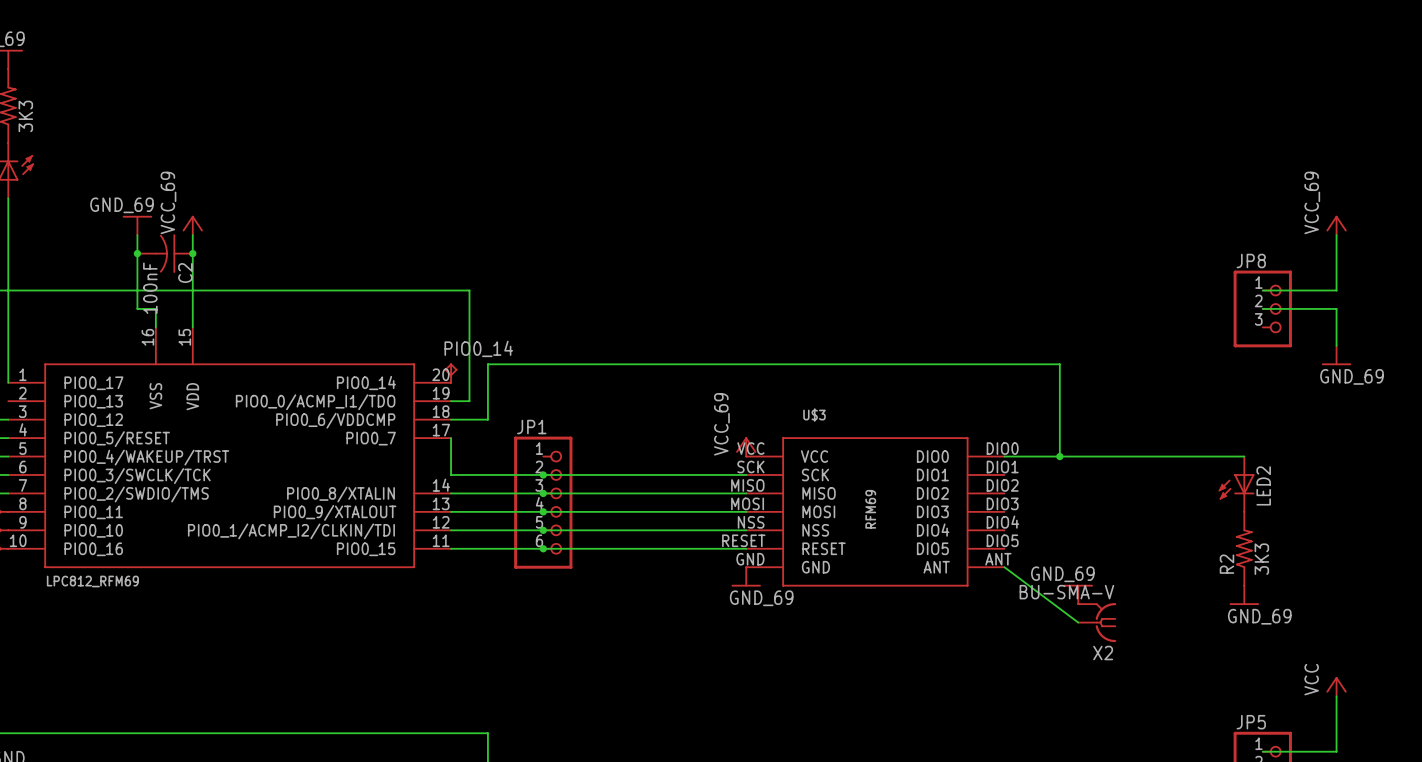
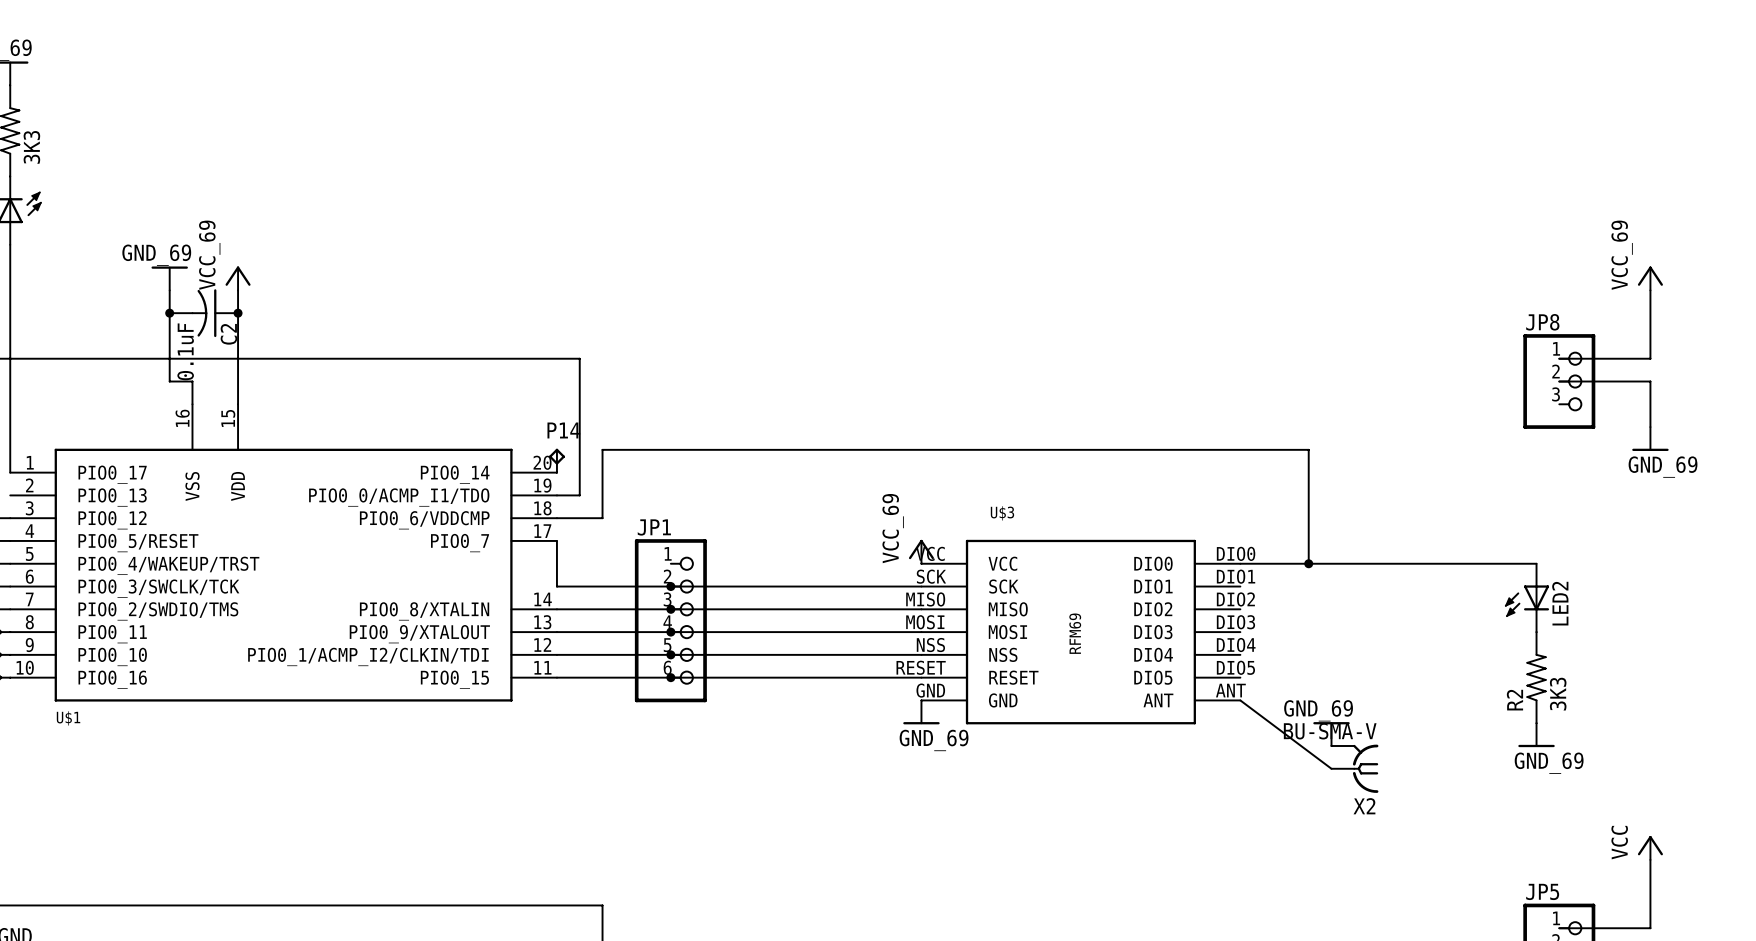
C2 value: 100nF (150, 288) -> 0.1uF (185, 351)
PIO0_14 name: PIO0_14 (478, 348) -> P14 (563, 430)
LPC812_RFM69 name: LPC812_RFM69 (92, 581) -> U$1 (68, 718)

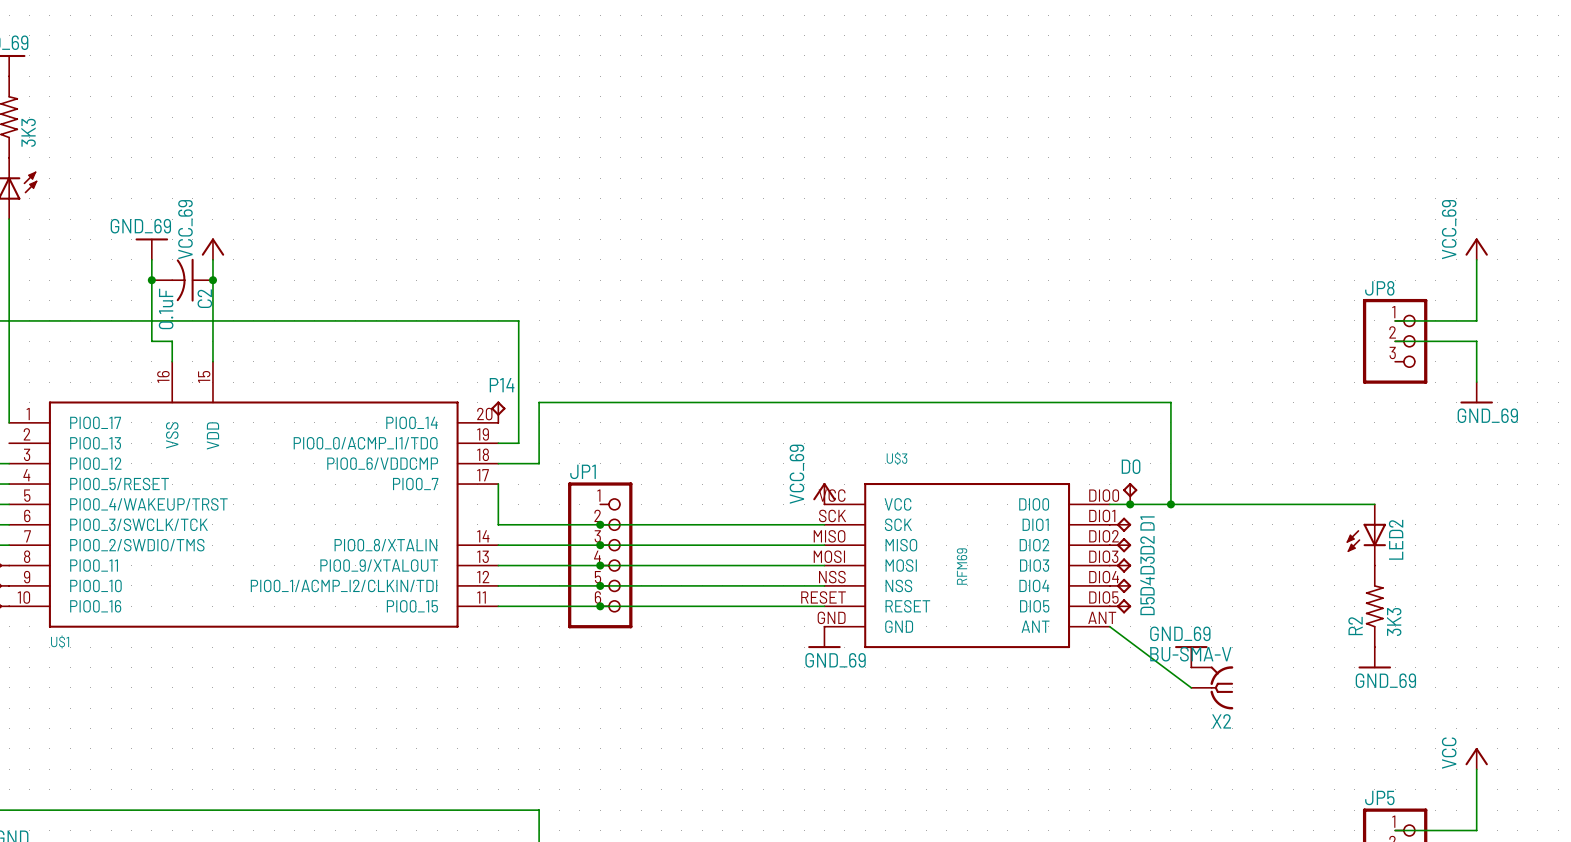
D0: none -> (1130, 493)
junction: none -> (1130, 504)
D1: none -> (1120, 524)
D2: none -> (1120, 545)
D3: none -> (1120, 565)
D4: none -> (1120, 585)
D5: none -> (1120, 606)

